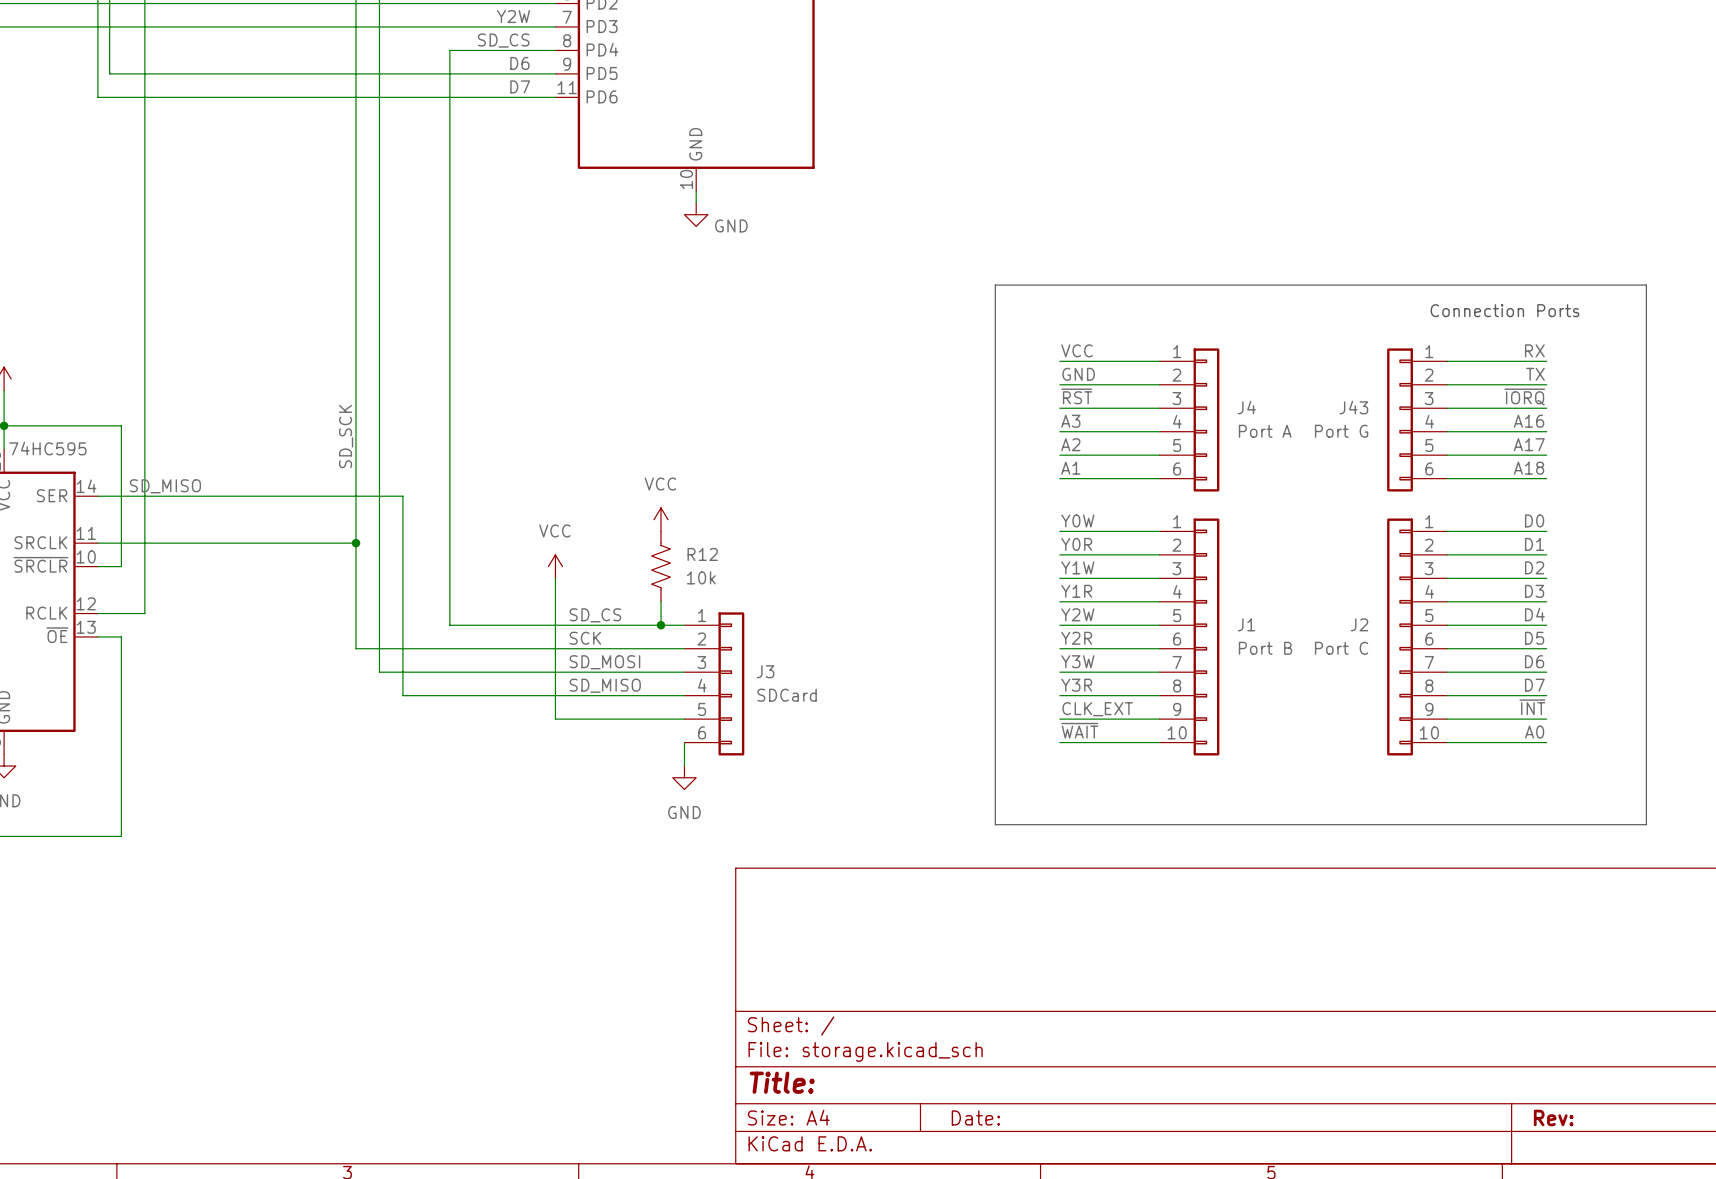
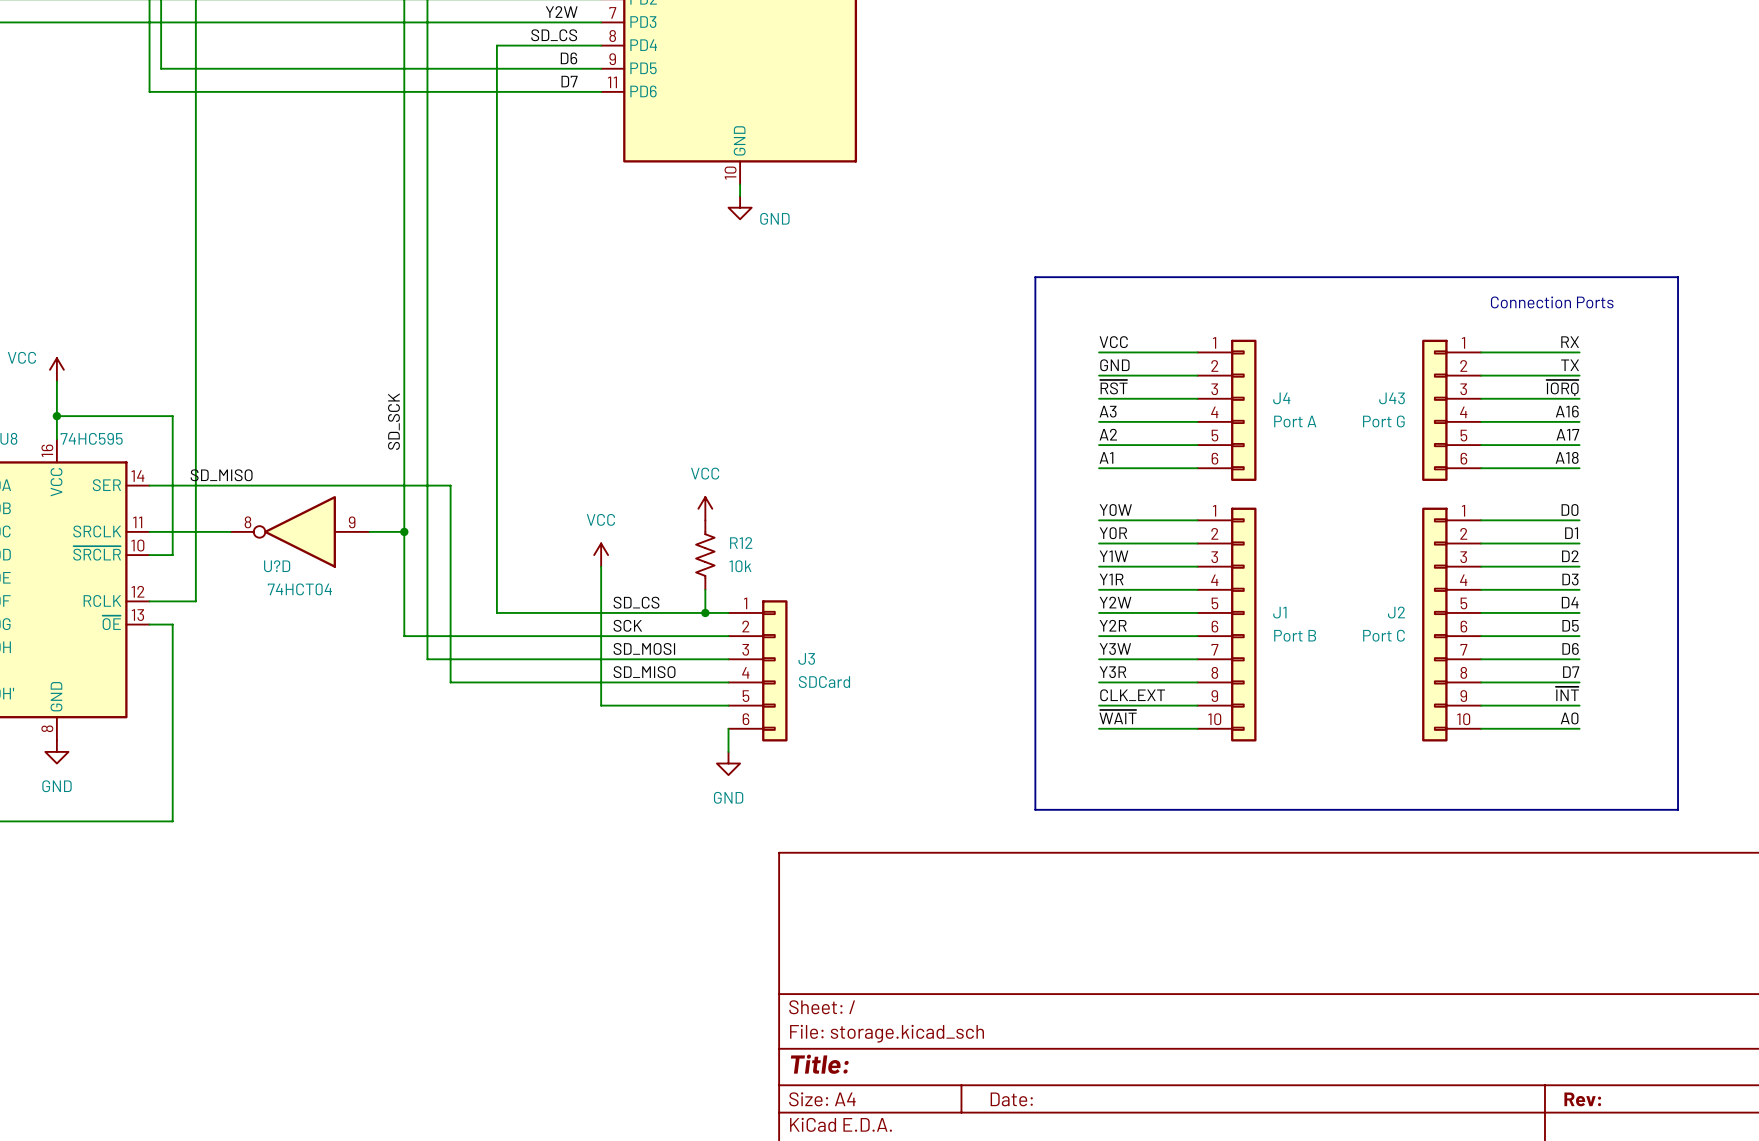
U?D: none -> 74HCT04 (300, 531)

